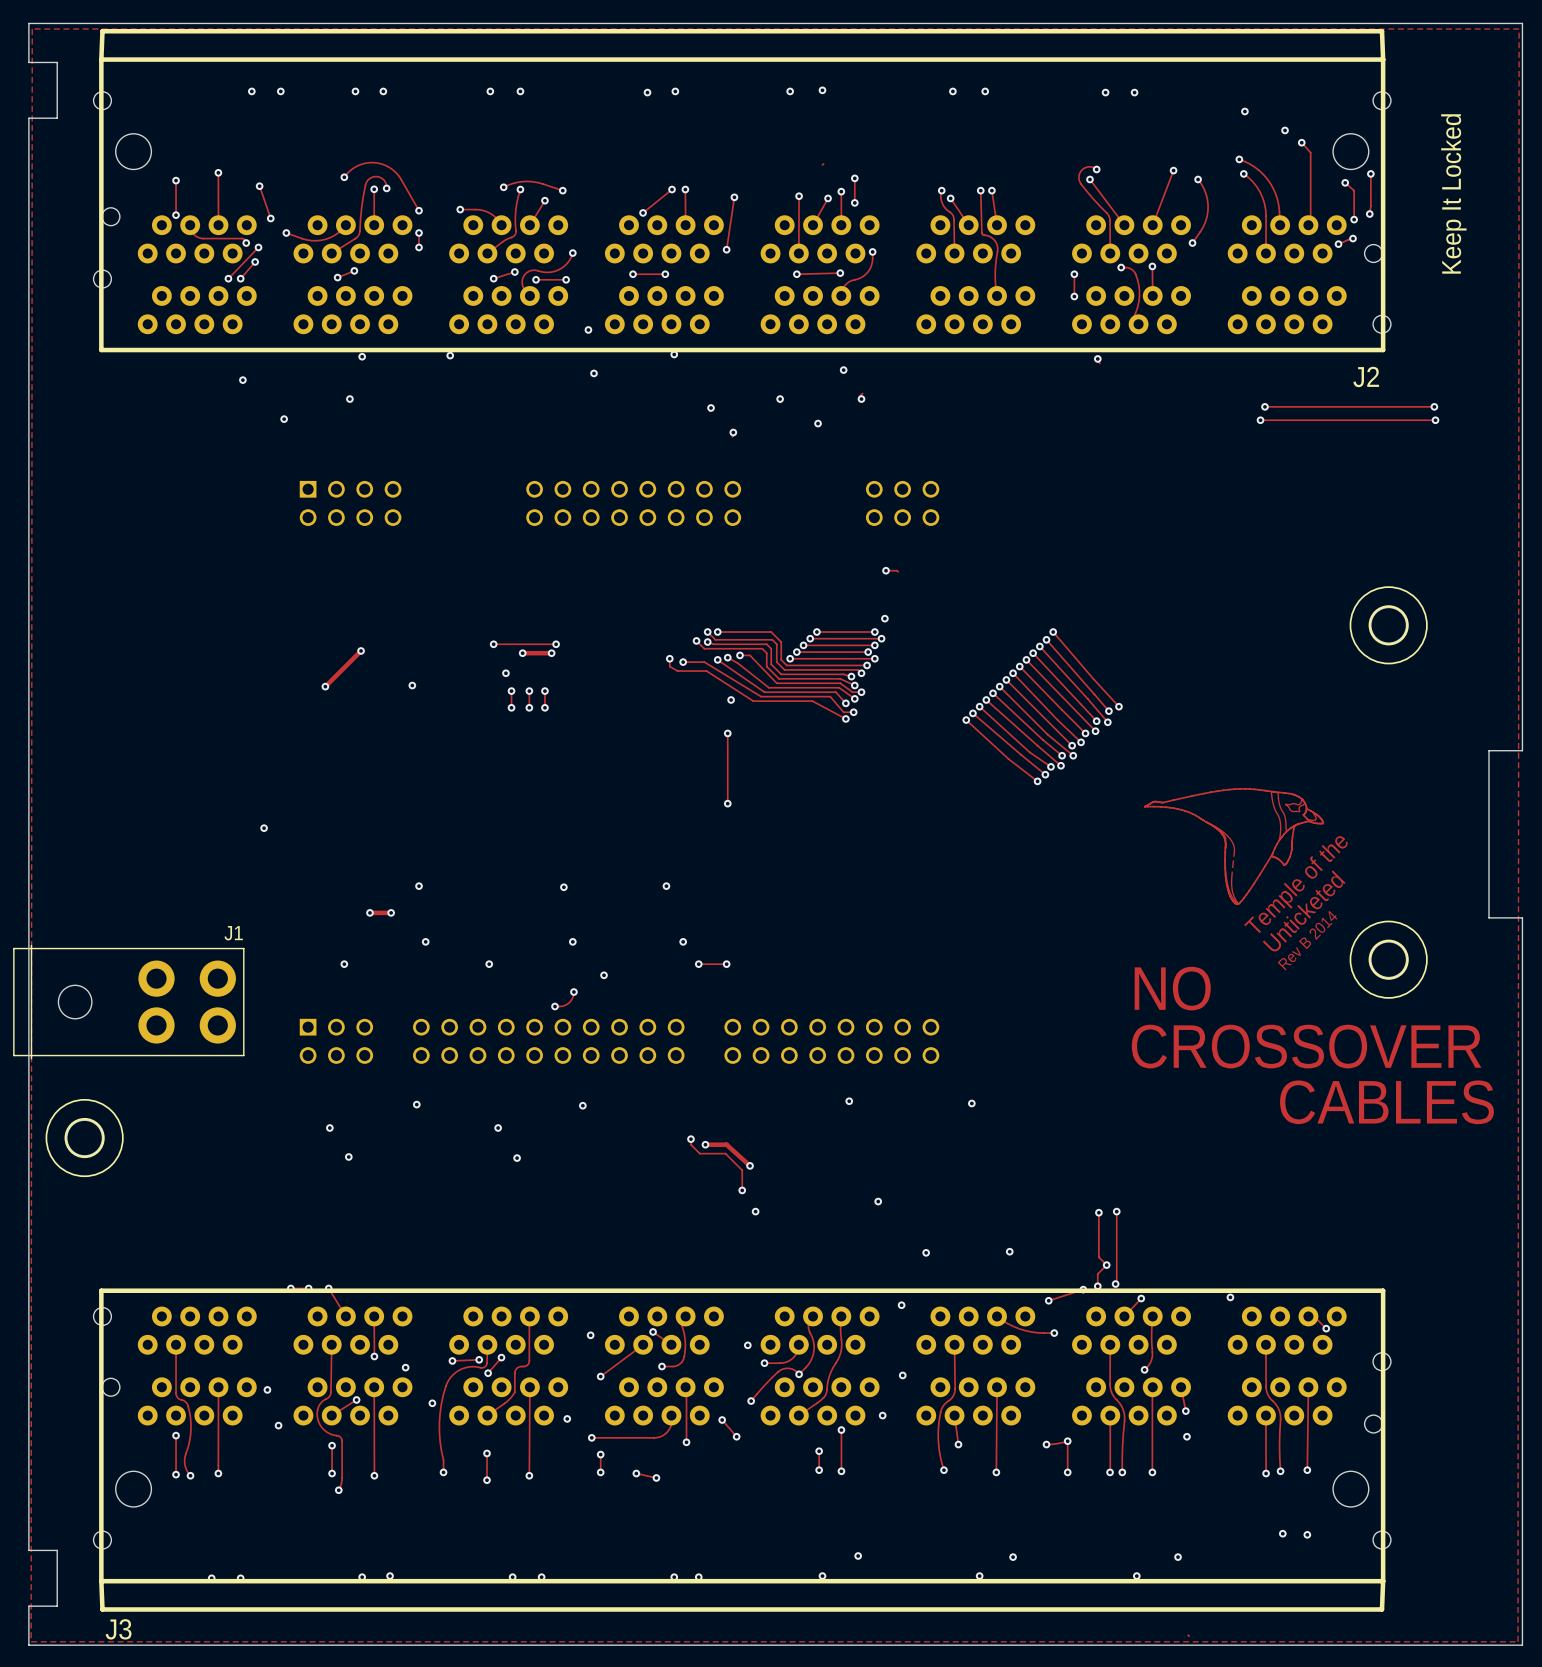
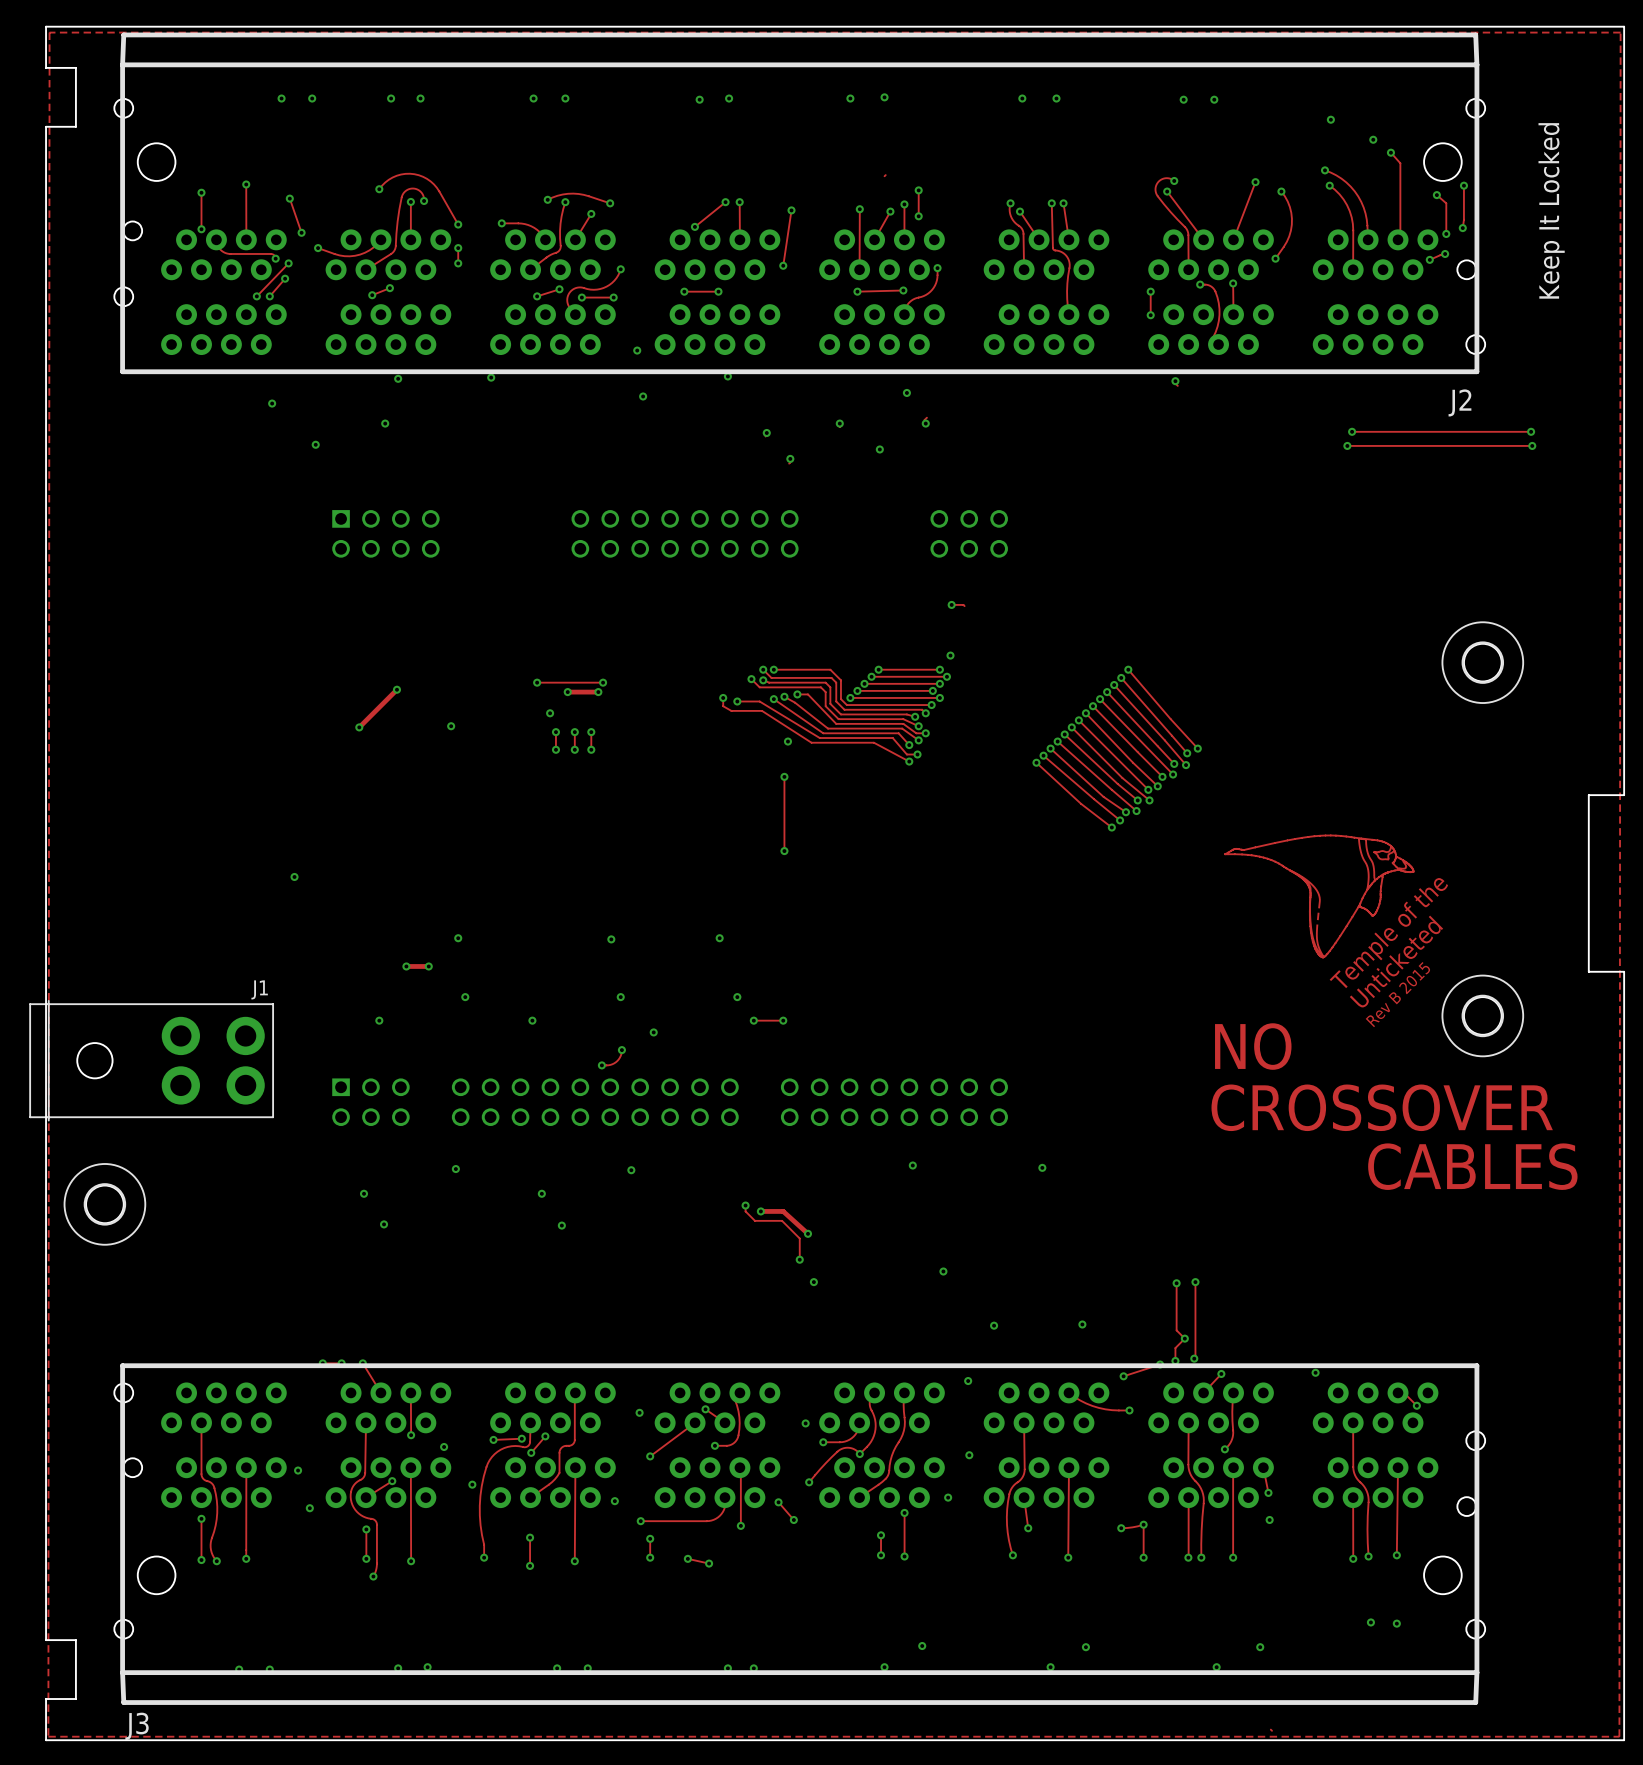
text: Rev B 2014 (1307, 940) -> Rev B 2015 (1397, 994)

